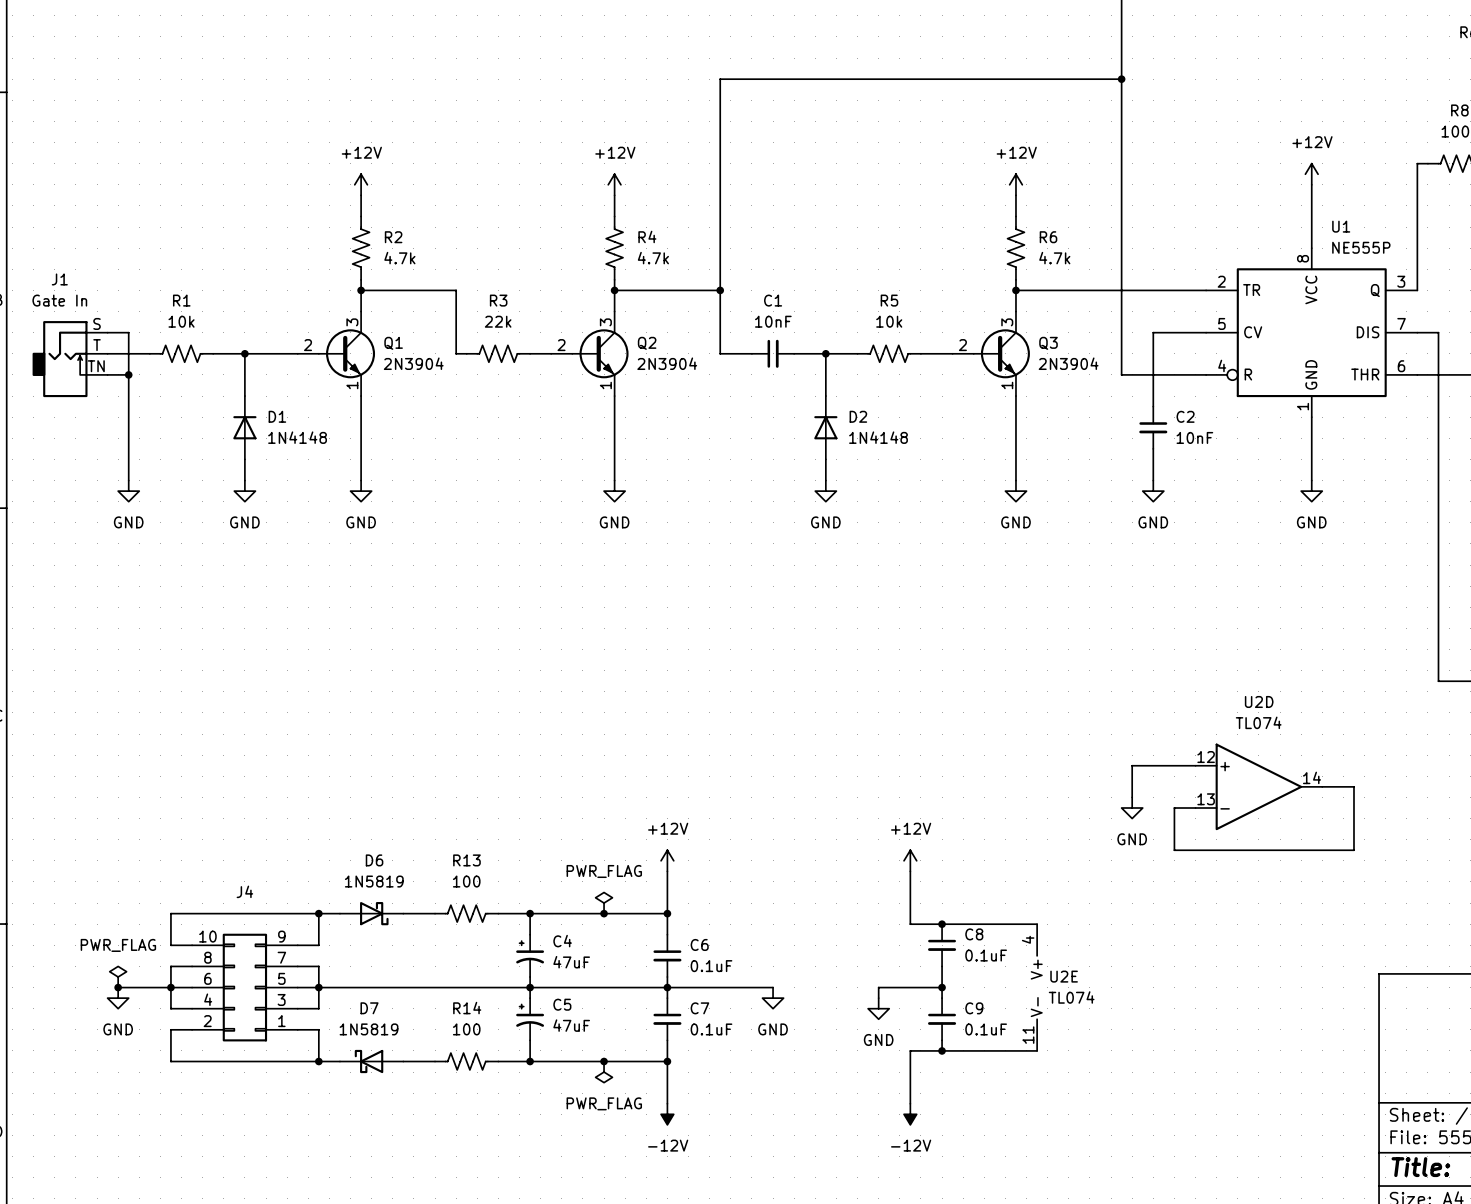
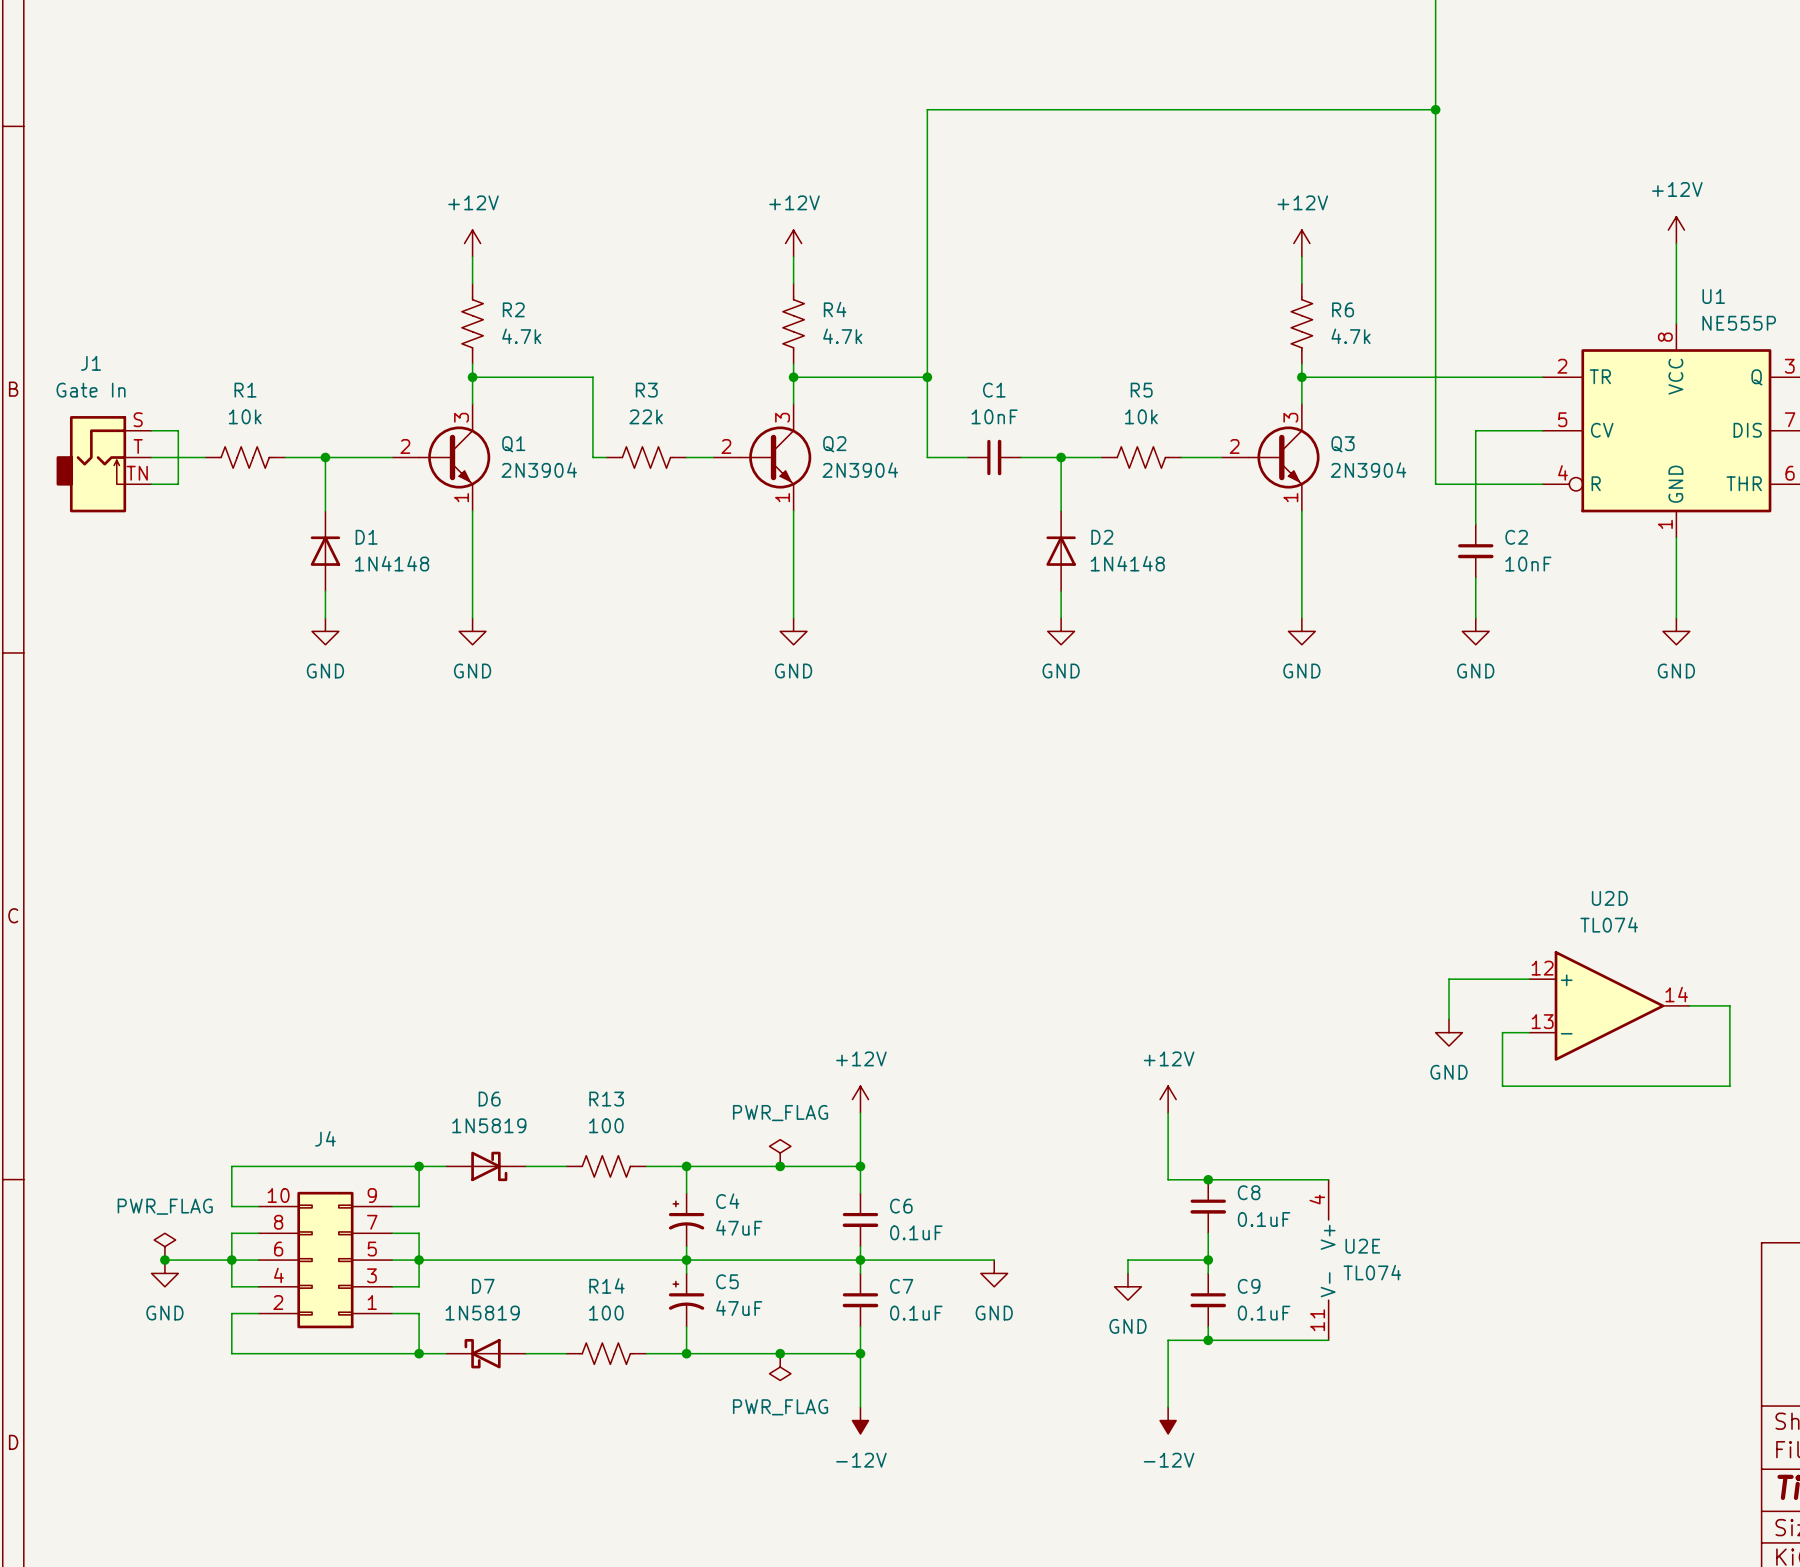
wire: (128, 374) (128, 480) -> none
junction: (128, 374) -> none
power symbol: GND (128, 491) -> none

